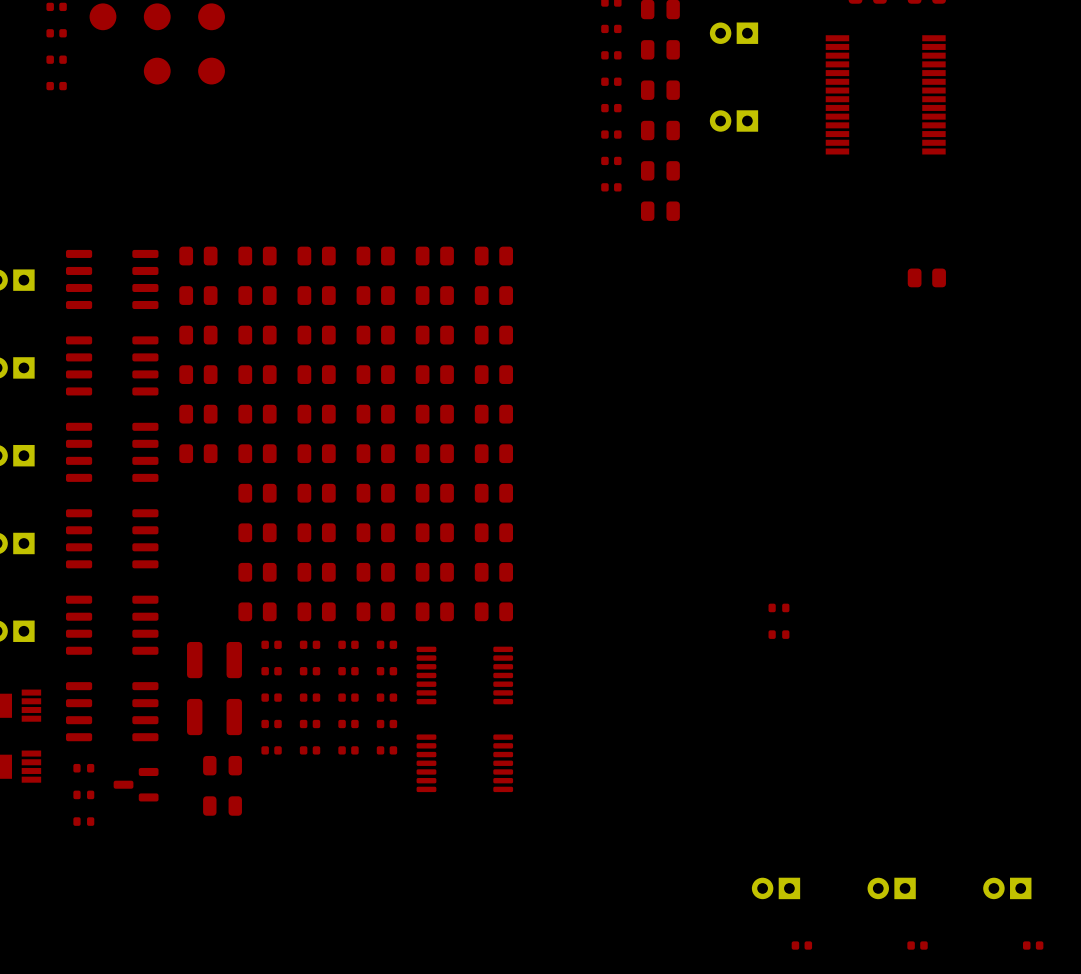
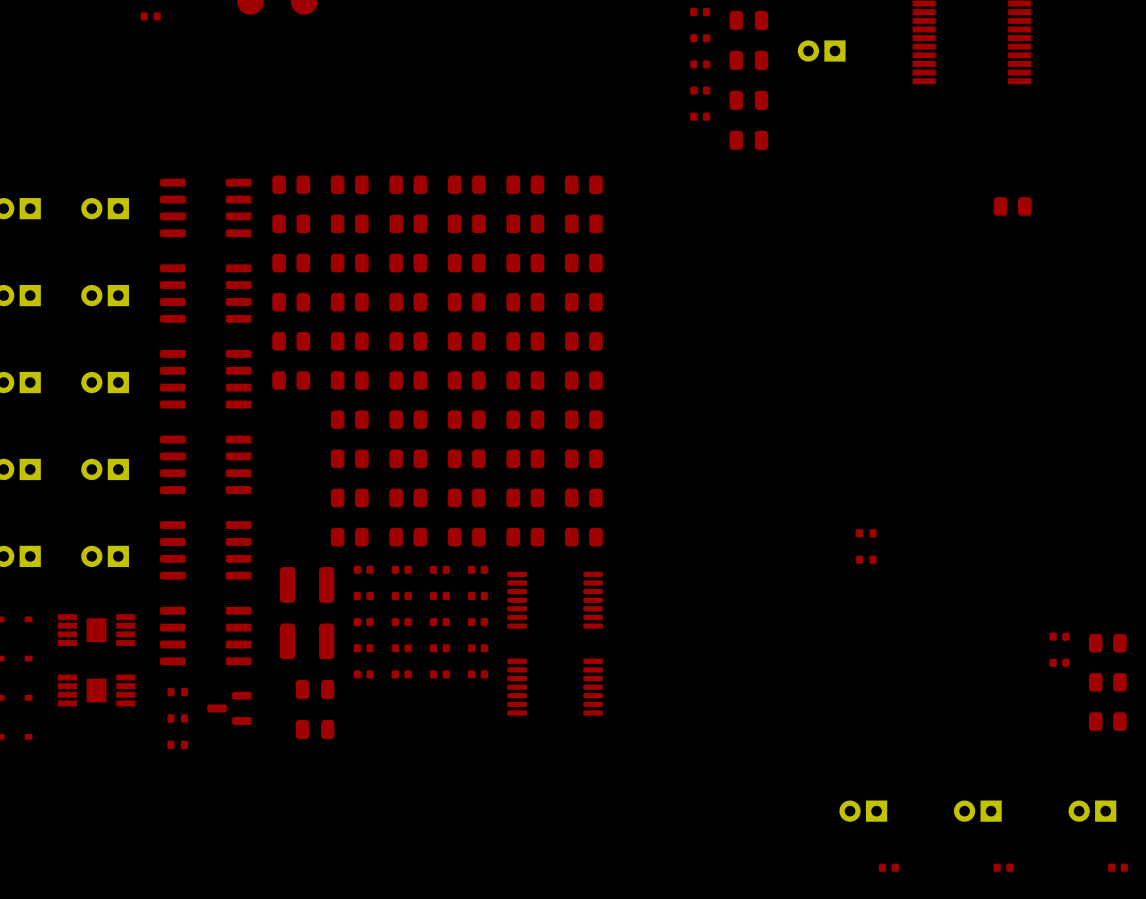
part: none -> (1059, 636)
part: none -> (1107, 643)
part: none -> (1059, 662)
part: none -> (1107, 682)
part: none -> (1107, 721)

